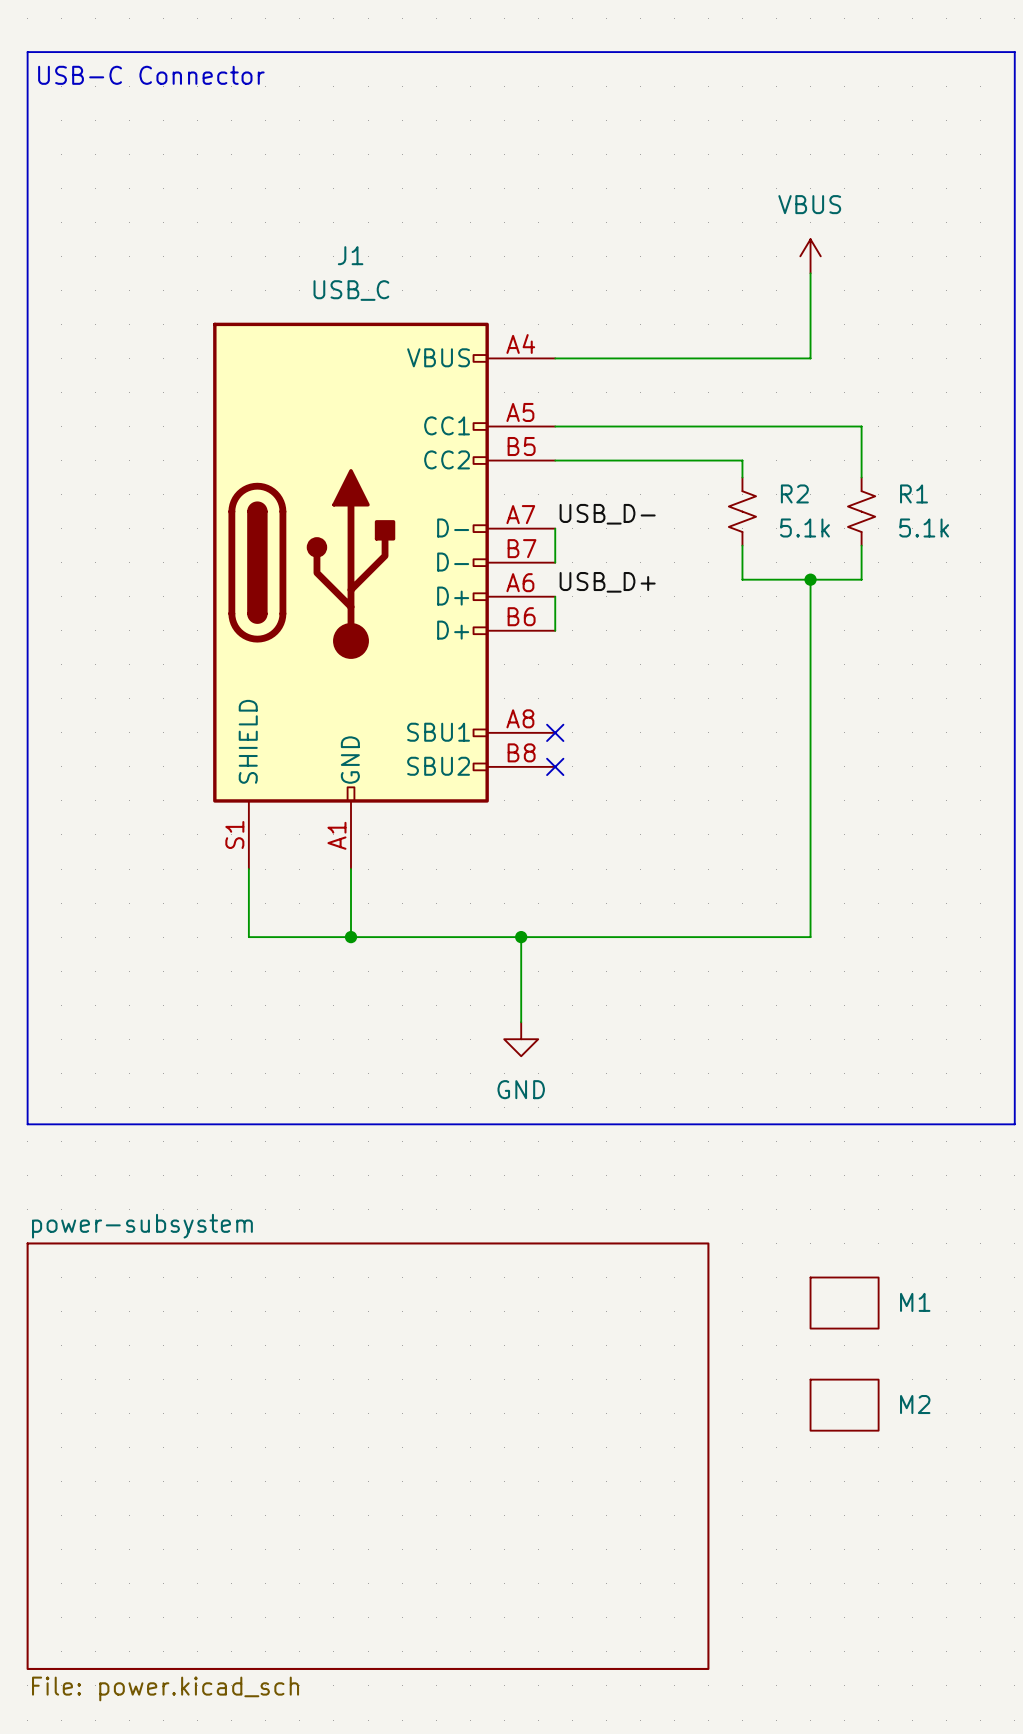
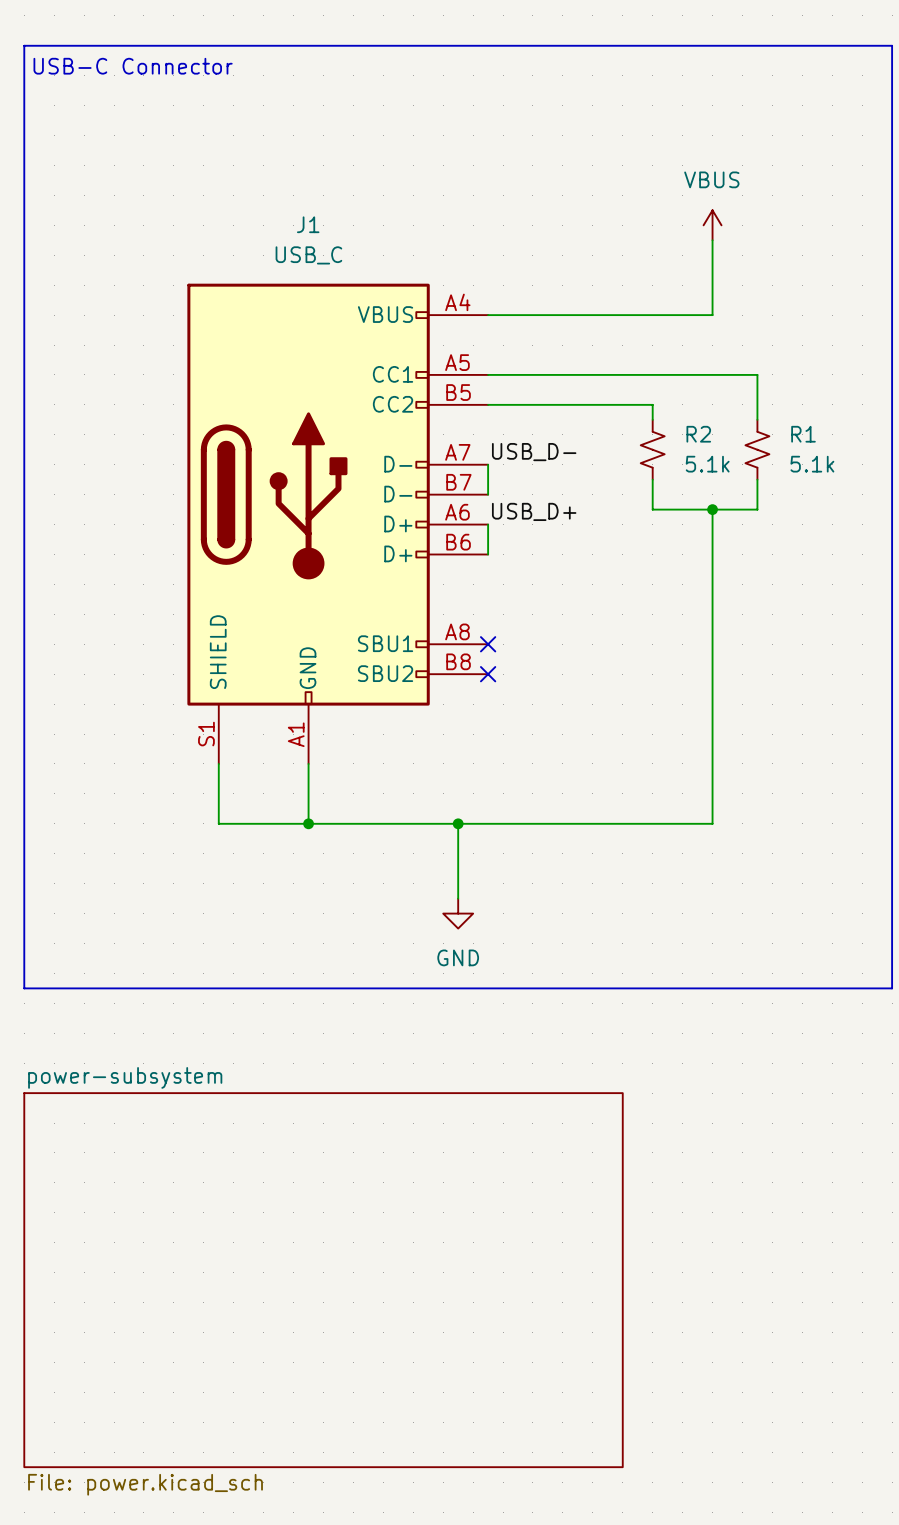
M1: (844, 1303) -> none
M2: (844, 1405) -> none

